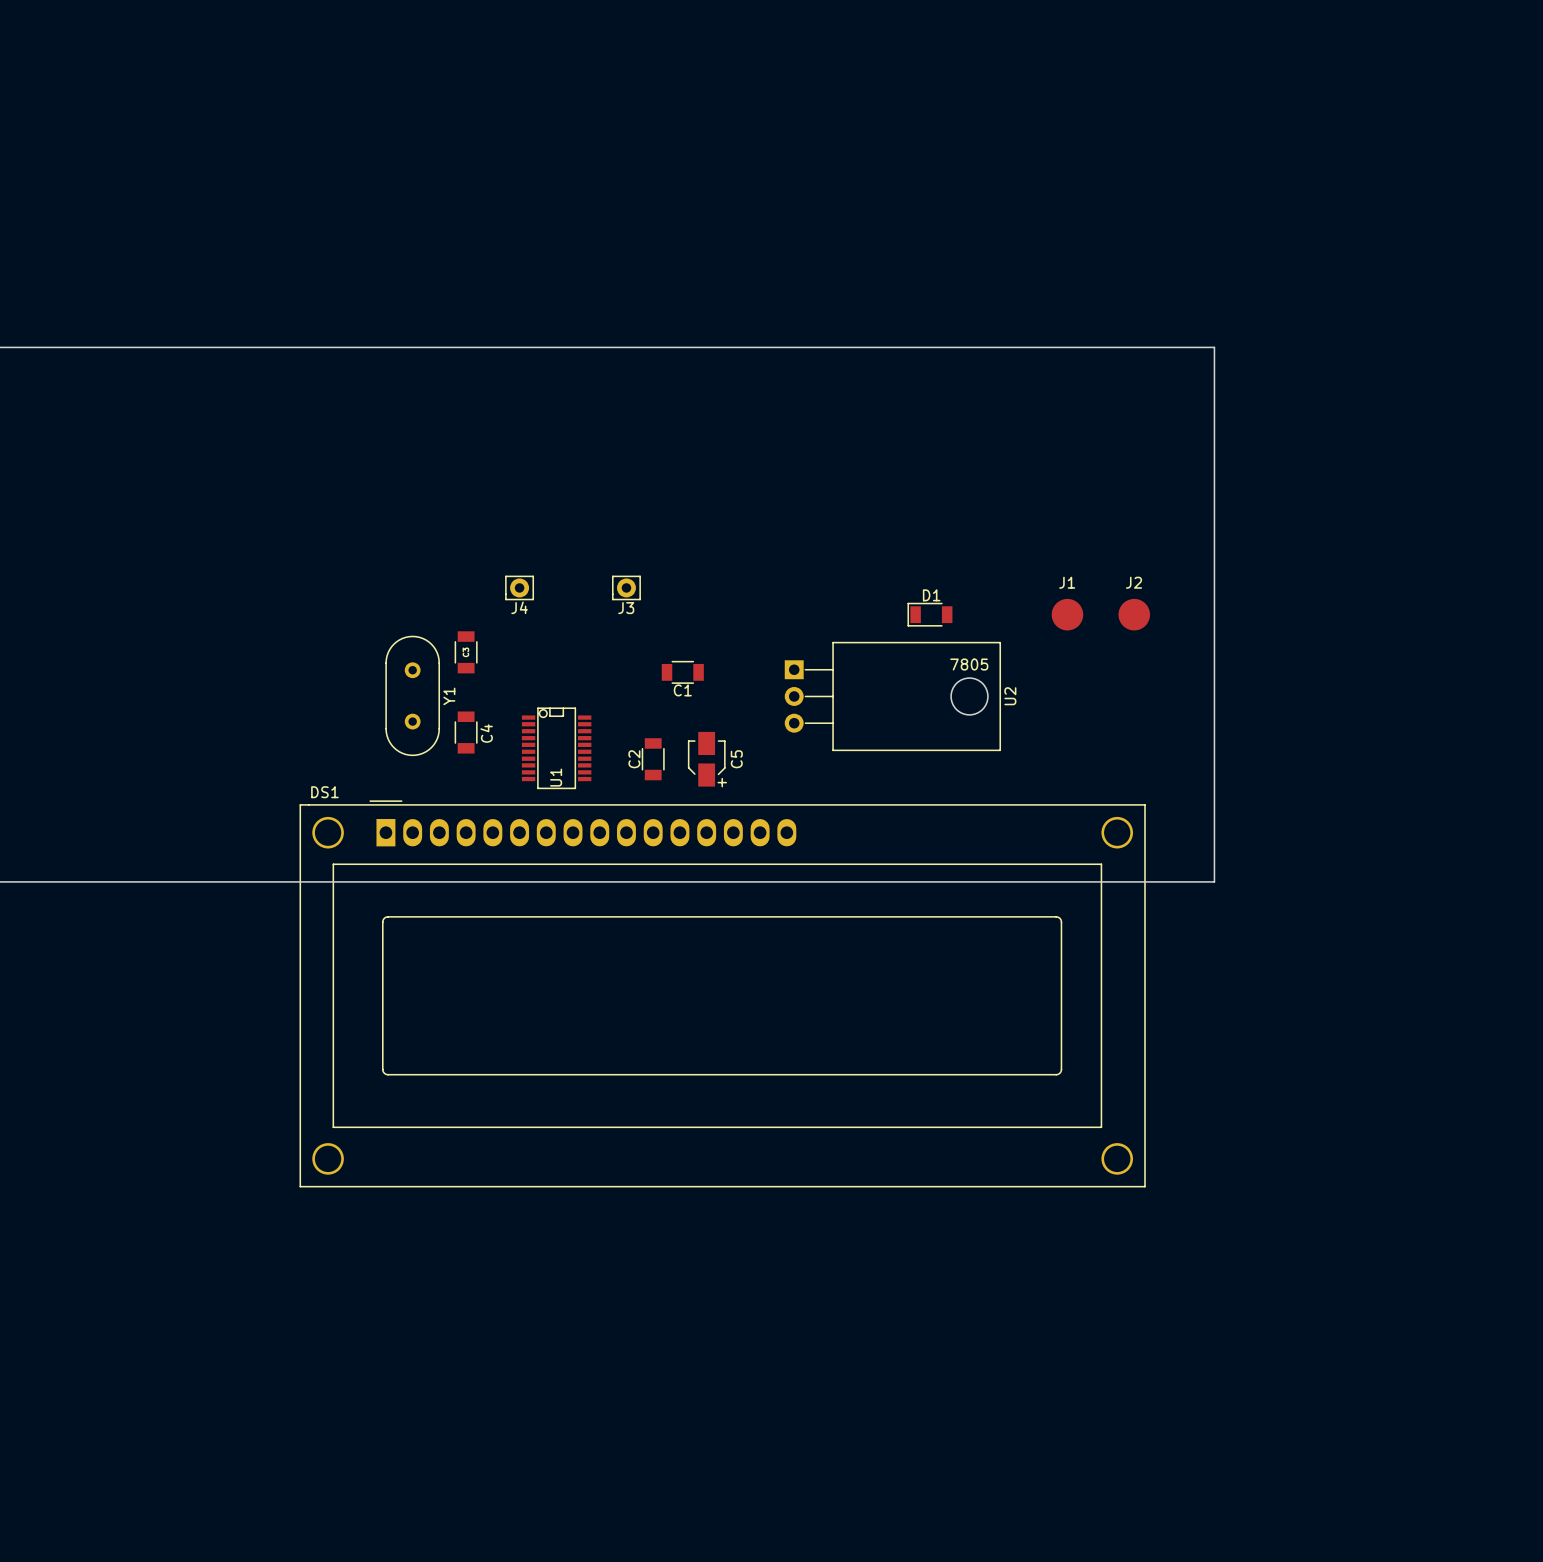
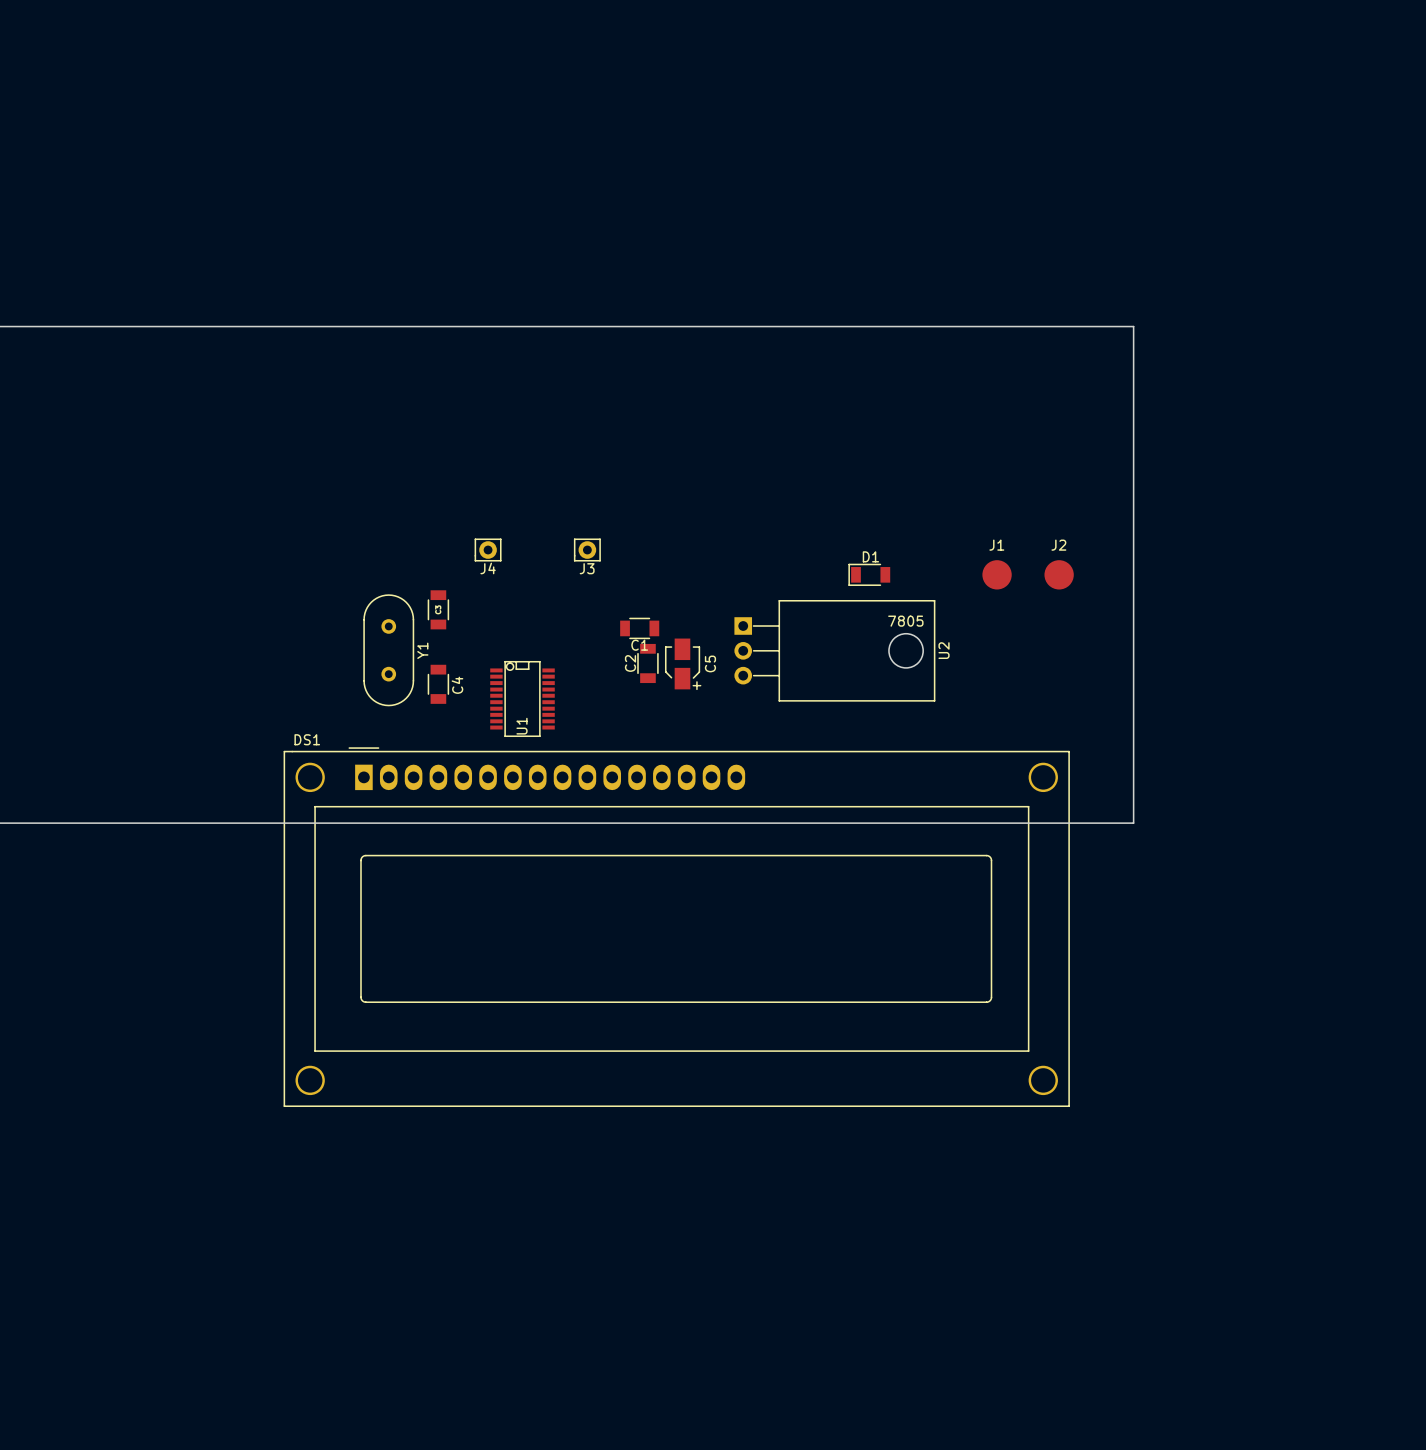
C2 position: (653, 759) -> (647, 663)
C5 position: (706, 759) -> (682, 663)

